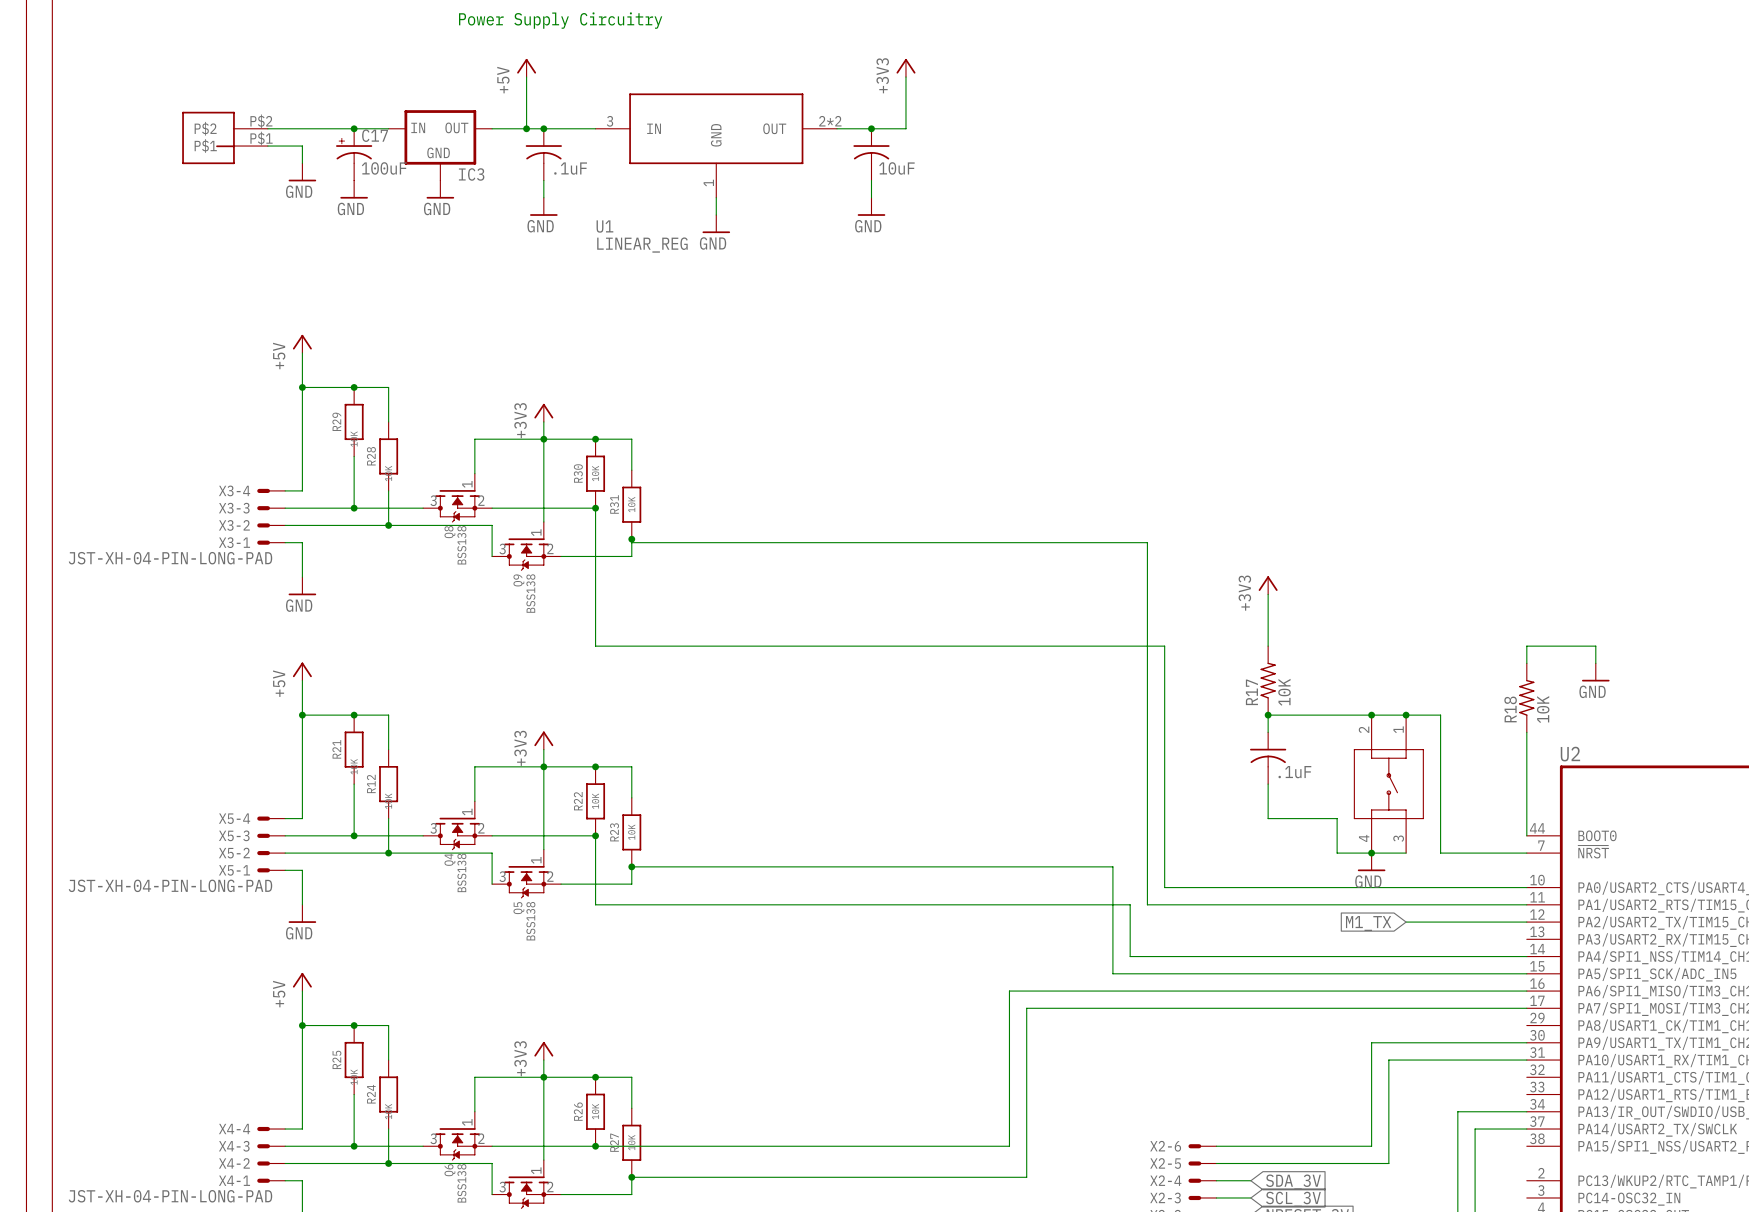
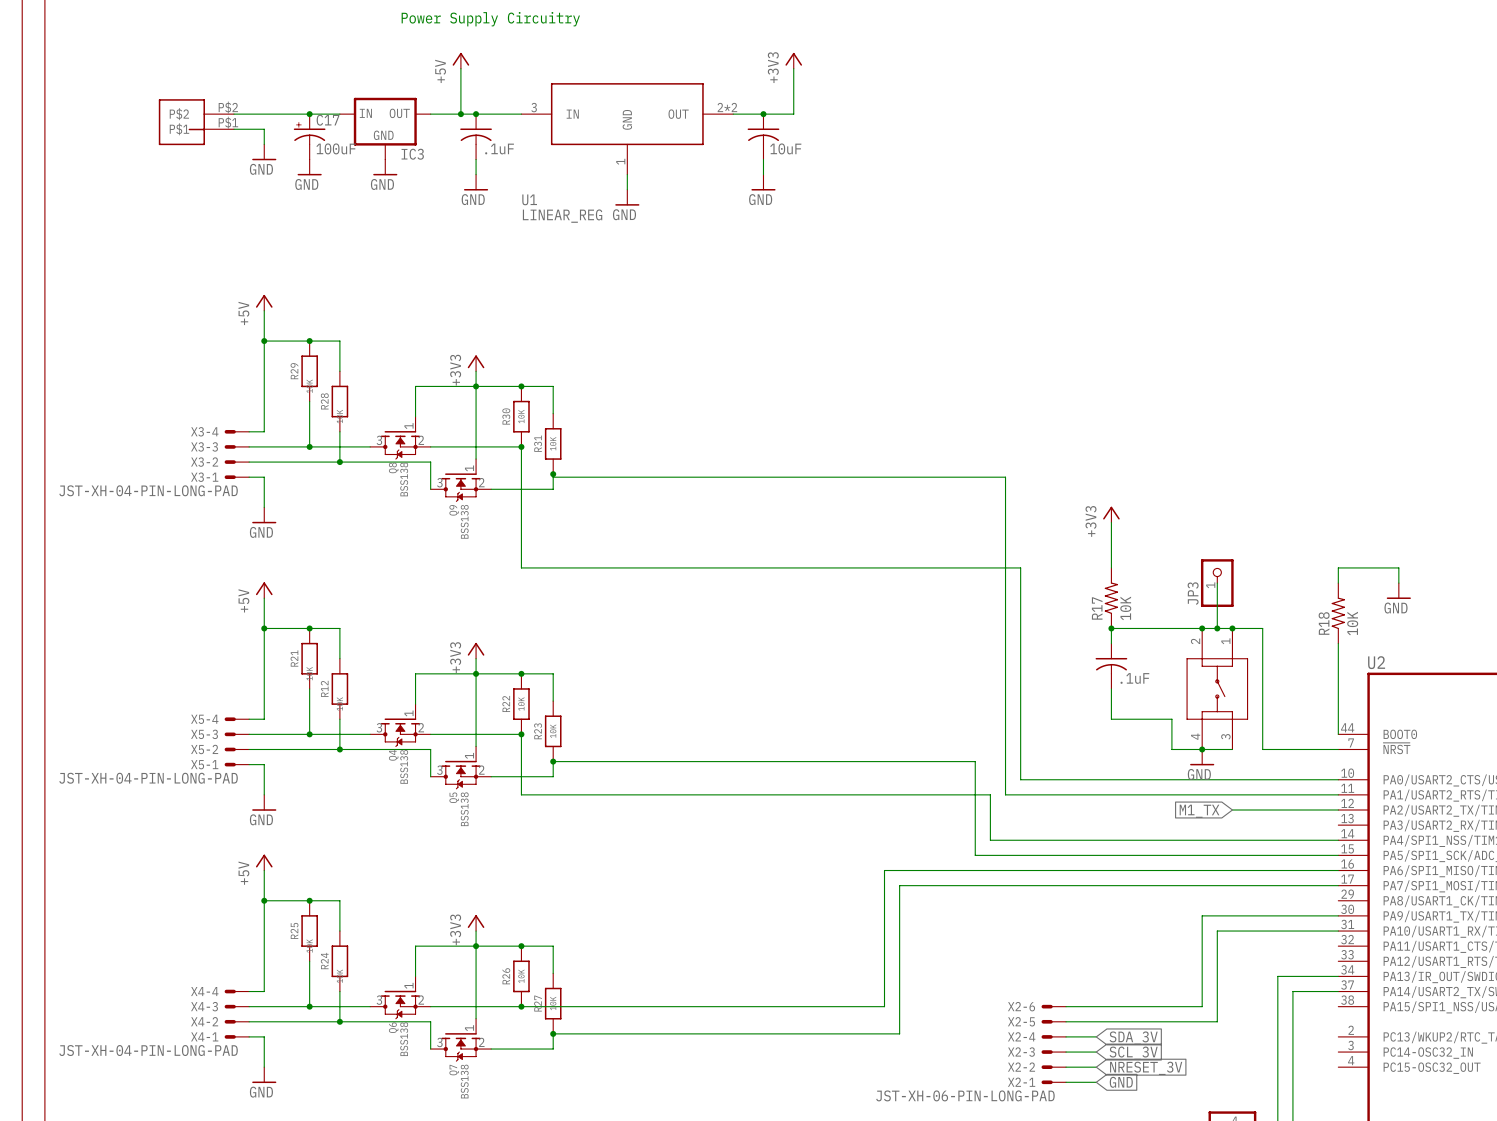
wire: none -> (1217, 583) (1217, 628)
JP3: none -> (1217, 583)
junction: none -> (1217, 628)

